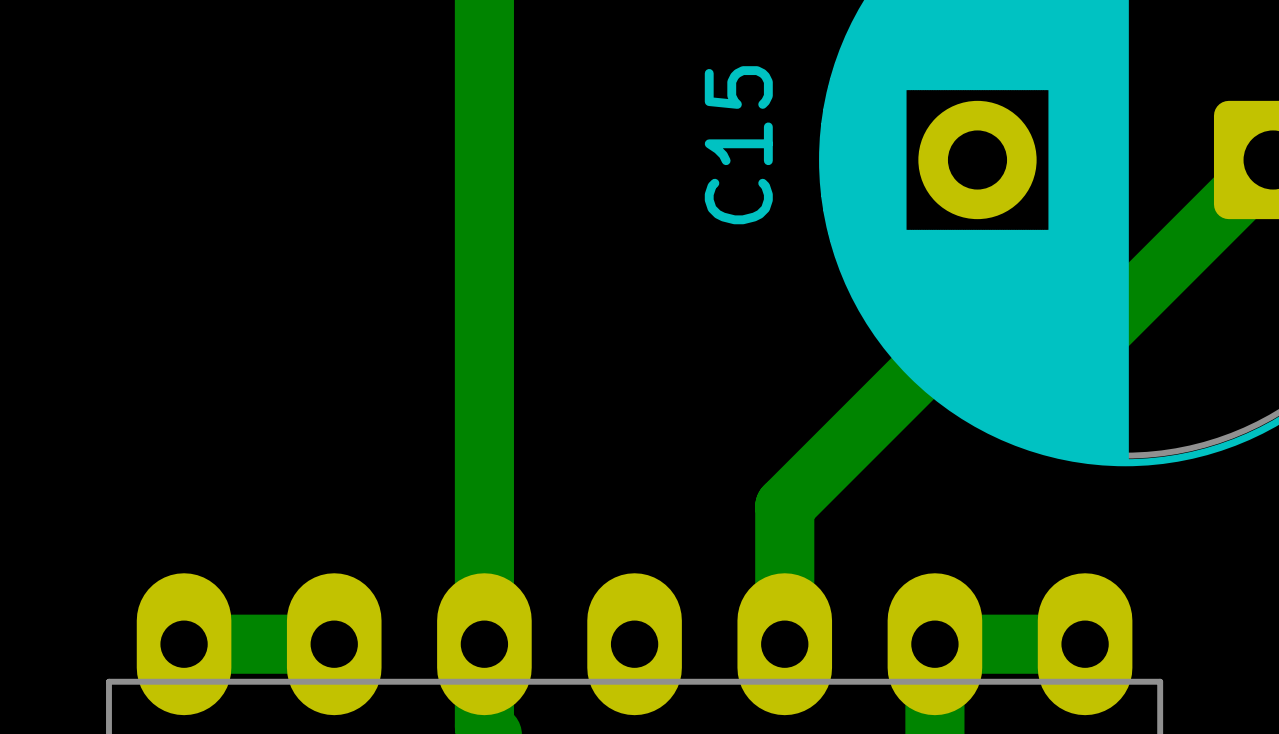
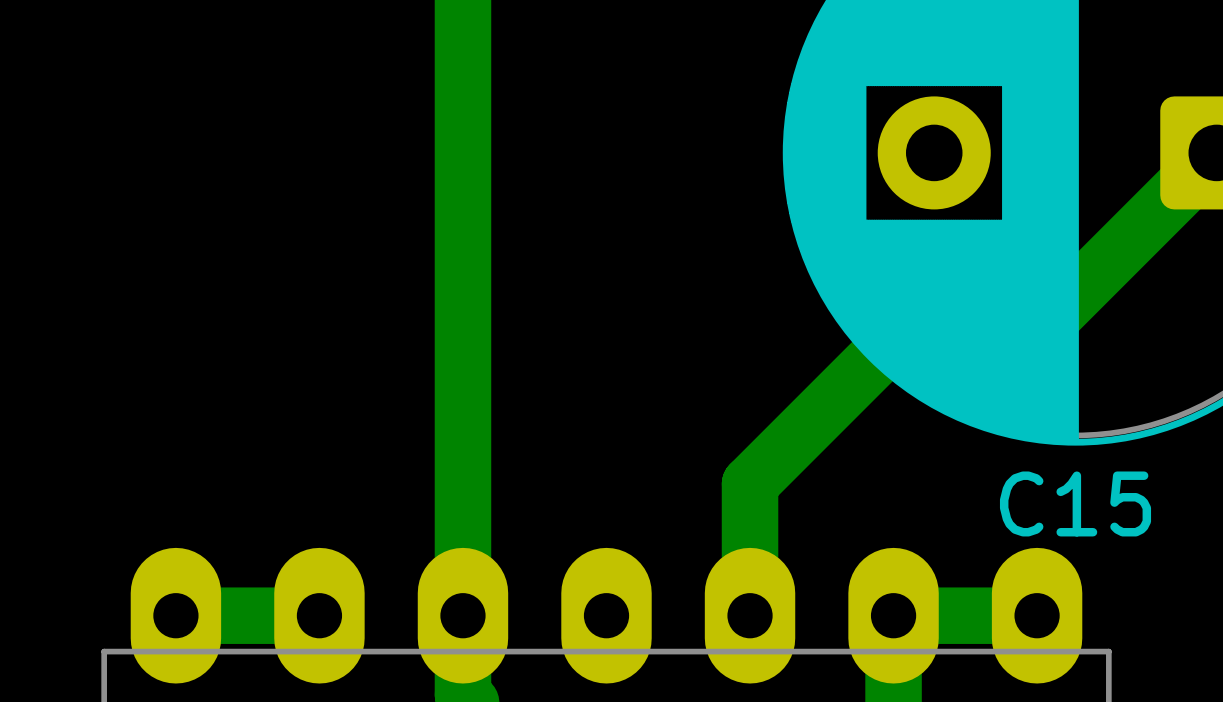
C15 name rotation: 0° (738, 145) -> 90° clockwise (1075, 503)
C15 name position: C15 (738, 145) -> C15 (1075, 503)

